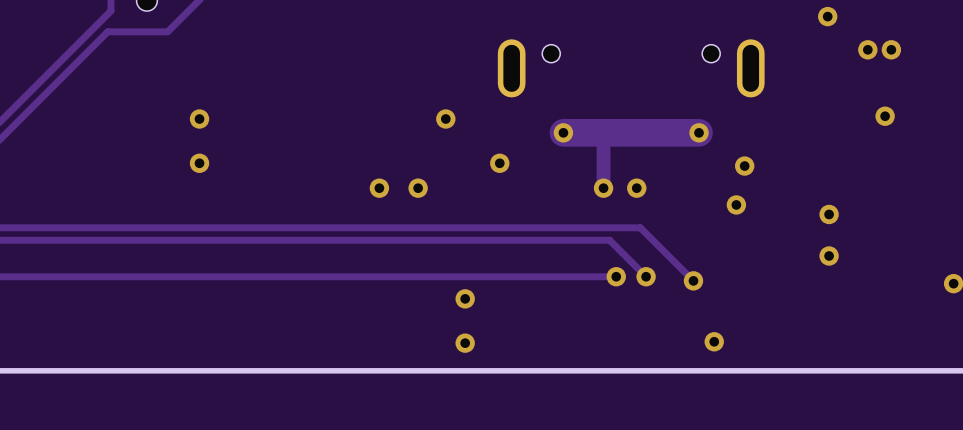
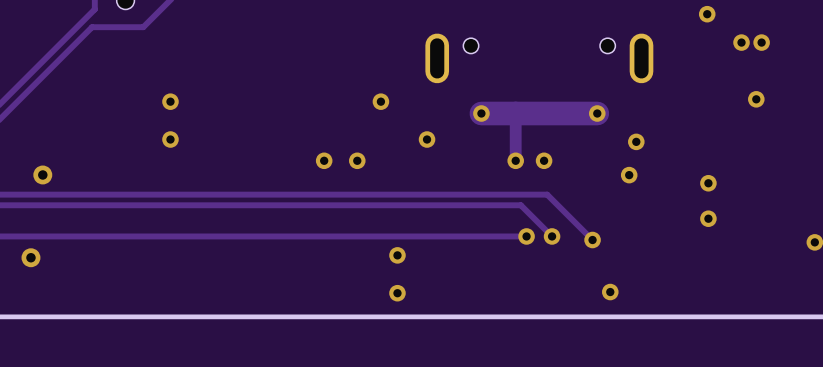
via: none -> (42, 174)
via: none -> (30, 257)

